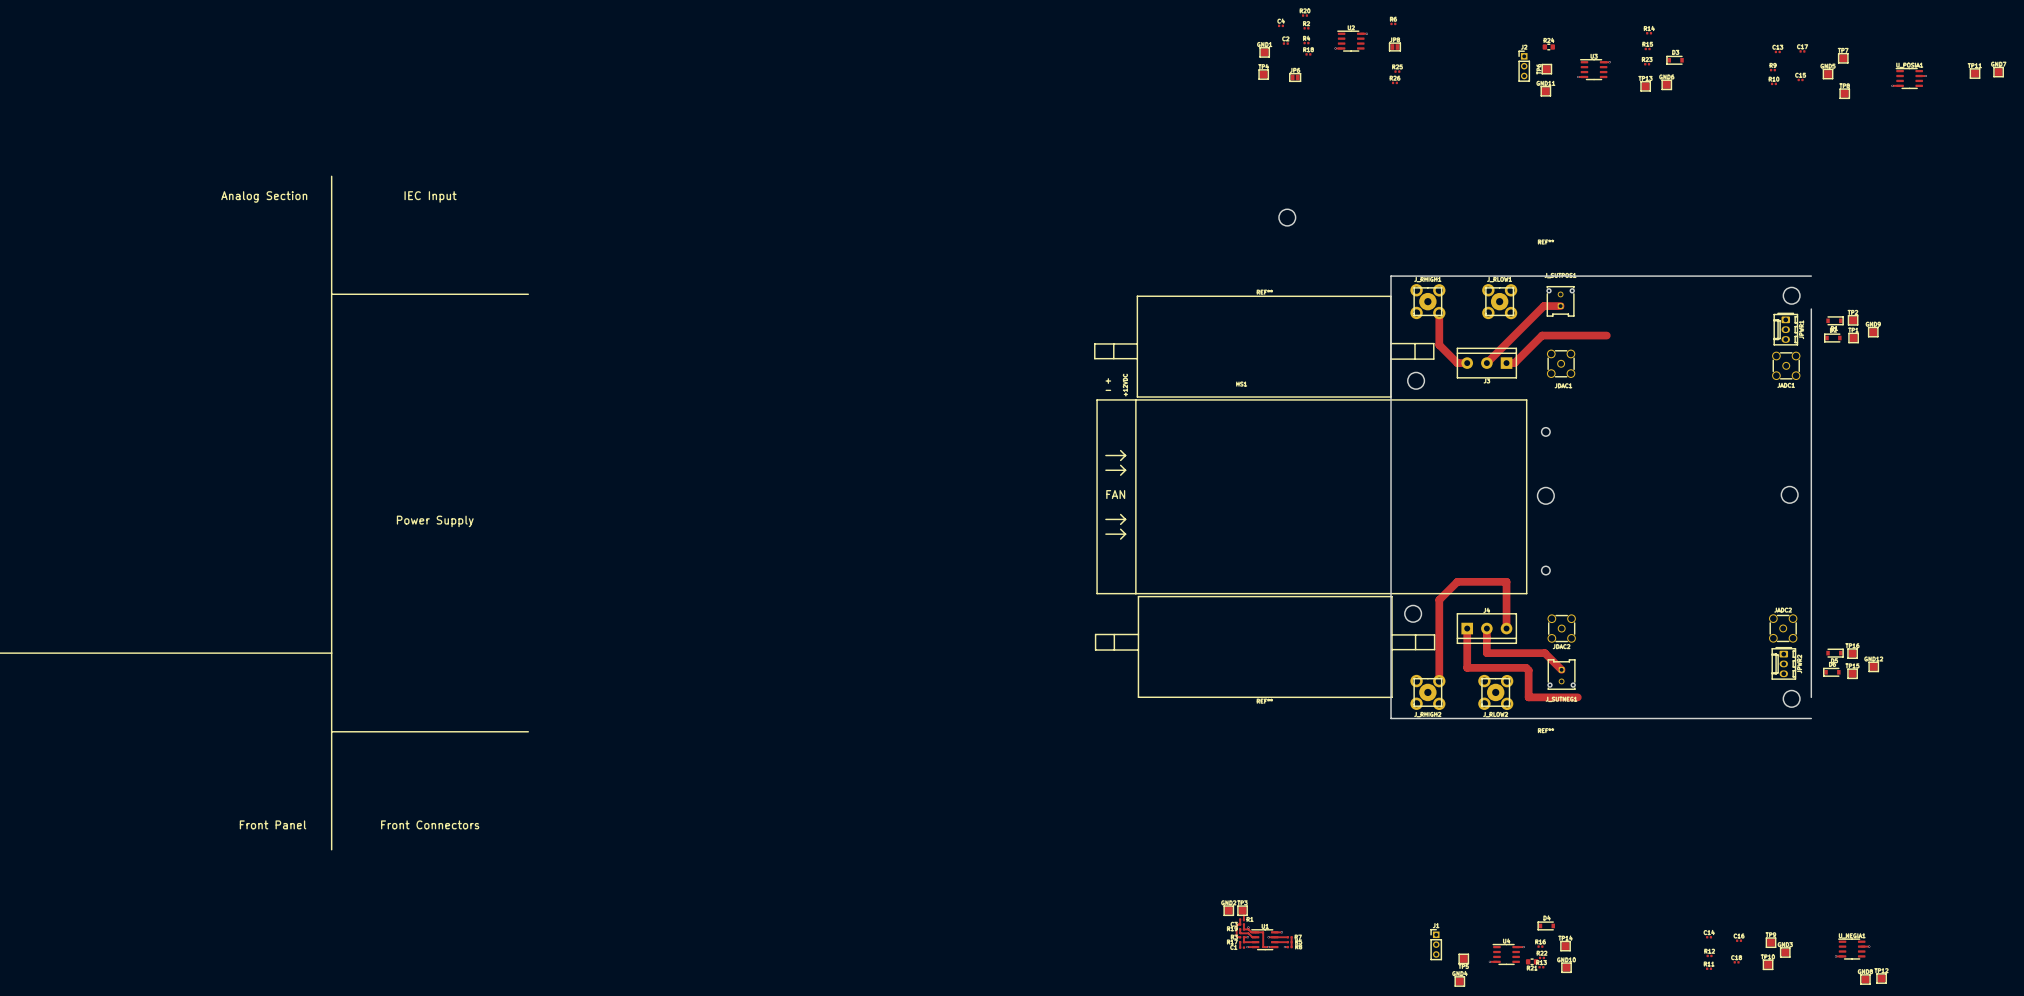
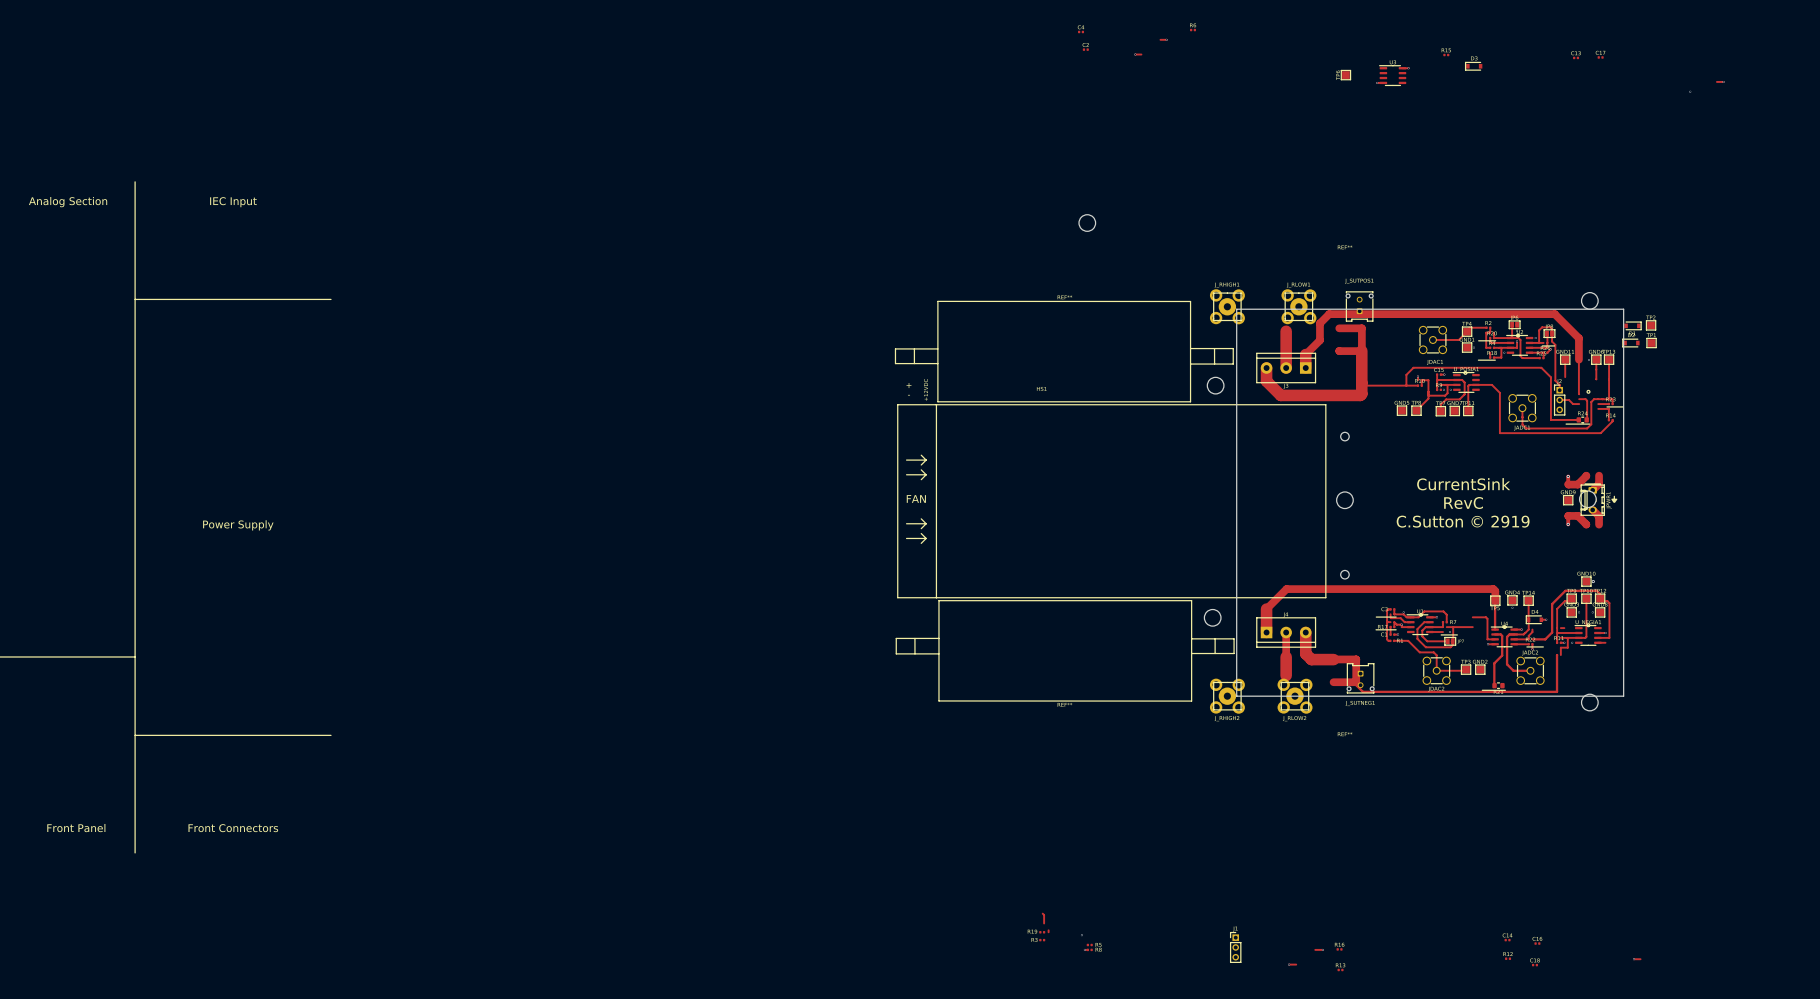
part position: (1304, 15) -> (1492, 338)
part position: (1306, 28) -> (1488, 327)
part position: (1649, 33) -> (1610, 420)
part position: (1351, 41) -> (1519, 345)
part position: (1306, 43) -> (1492, 347)
part position: (1394, 47) -> (1549, 333)
part position: (1548, 47) -> (1582, 419)
part position: (1264, 52) -> (1467, 347)
part position: (1308, 54) -> (1492, 357)
part position: (1843, 58) -> (1440, 411)
part position: (1647, 64) -> (1610, 404)
part position: (1524, 66) -> (1559, 400)
part position: (1772, 70) -> (1438, 389)
part position: (1397, 71) -> (1541, 358)
part position: (1998, 72) -> (1454, 410)
part position: (1975, 73) -> (1468, 410)
part position: (1263, 74) -> (1467, 331)
part position: (1828, 74) -> (1402, 410)
part position: (1295, 77) -> (1514, 324)
part position: (1909, 78) -> (1466, 382)
part position: (1800, 79) -> (1438, 374)
part position: (1394, 82) -> (1545, 352)
part position: (1773, 83) -> (1419, 385)
part position: (1666, 84) -> (1596, 359)
track: (1892, 85) (1900, 85) -> none
part position: (1645, 86) -> (1609, 359)
part position: (1545, 91) -> (1565, 359)
part position: (1844, 93) -> (1416, 410)
board edge: (1811, 276) (1391, 276) (1391, 718) (1811, 718) -> none
board edge: none -> (1236, 309) (1623, 309) (1623, 696) (1236, 696) (1236, 309)
track: (1560, 306) (1543, 306) (1486, 363) -> (1286, 331) (1286, 368)
board edge: (1811, 309) (1811, 697) -> none
track: (1439, 313) (1439, 345) (1457, 363) (1467, 363) -> (1361, 350) (1360, 395) (1280, 395) (1266, 381) (1266, 368)
track: none -> (1512, 324) (1510, 338)
track: none -> (1486, 327) (1469, 327) (1458, 339) (1432, 339)
track: none -> (1490, 327) (1490, 332) (1486, 332) (1486, 347) (1490, 347)
track: none -> (1339, 328) (1361, 328) (1361, 350) (1339, 350)
via: none -> (1517, 330)
track: none -> (1493, 332) (1493, 338) (1518, 338) (1520, 339) (1520, 356) (1522, 358) (1539, 358)
track: none -> (1547, 332) (1547, 347) (1529, 347)
drawing: none -> [1516, 333, 1520, 338]
track: none -> (1551, 333) (1550, 327) (1542, 327) (1539, 330) (1539, 342)
track: none -> (1552, 333) (1552, 341) (1555, 344) (1555, 380) (1559, 385) (1559, 390)
part position: (1785, 329) -> (1592, 499)
part position: (1873, 332) -> (1568, 500)
track: none -> (1490, 338) (1491, 342) (1510, 342)
via: none -> (1535, 338)
track: (1606, 335) (1542, 335) (1514, 363) (1506, 363) -> (1579, 394) (1578, 338) (1554, 314) (1329, 314) (1319, 323) (1319, 340) (1305, 354) (1305, 368)
line: none -> (1478, 340) (1495, 340)
track: none -> (1517, 341) (1517, 347) (1493, 347)
via: none -> (1517, 341)
track: none -> (1529, 342) (1543, 342)
line: none -> (1542, 345) (1554, 345)
via: none -> (1473, 347)
track: none -> (1501, 347) (1501, 357) (1493, 357)
track: none -> (1550, 349) (1547, 352)
via: none -> (1550, 349)
track: none -> (1490, 352) (1490, 357)
via: none -> (1504, 352)
track: none -> (1529, 352) (1543, 352) (1543, 358)
track: none -> (1565, 359) (1565, 377)
track: none -> (1596, 359) (1596, 379)
line: none -> (1478, 360) (1495, 360)
via: none -> (1589, 359)
part position: (1561, 363) -> (1432, 339)
part position: (1786, 365) -> (1522, 408)
drawing: none -> [1463, 371, 1468, 375]
track: none -> (1437, 374) (1437, 390)
track: none -> (1440, 374) (1444, 374)
via: none -> (1444, 374)
track: none -> (1417, 376) (1418, 380)
via: none -> (1417, 376)
track: none -> (1437, 380) (1462, 380) (1464, 382) (1464, 394) (1459, 399) (1446, 399) (1440, 404) (1440, 411)
track: none -> (1361, 382) (1364, 385) (1418, 385)
track: none -> (1406, 385) (1406, 374) (1413, 367) (1541, 367) (1550, 377) (1550, 419) (1578, 419)
track: none -> (1421, 385) (1421, 380) (1428, 380) (1428, 398) (1416, 410)
track: none -> (1440, 384) (1456, 384)
track: none -> (1447, 384) (1447, 393) (1445, 395) (1428, 395)
via: none -> (1443, 389)
via: none -> (1450, 389)
drawing: none -> [1586, 390, 1591, 394]
track: none -> (1579, 399) (1587, 400) (1586, 419)
track: none -> (1612, 399) (1594, 399) (1591, 401) (1591, 424) (1587, 428) (1526, 428) (1522, 424) (1522, 417)
track: none -> (1612, 399) (1612, 404)
track: none -> (1559, 400) (1569, 400) (1573, 404) (1579, 404)
track: none -> (1598, 404) (1608, 404)
line: none -> (1606, 406) (1623, 406)
track: none -> (1522, 408) (1522, 417)
track: none -> (1598, 408) (1608, 408) (1608, 420)
track: none -> (1468, 410) (1468, 386) (1491, 384) (1499, 392) (1499, 433) (1600, 433) (1612, 420)
line: none -> (1566, 424) (1589, 424)
track: none -> (1586, 475) (1577, 484) (1568, 484) (1568, 476)
track: none -> (1599, 475) (1599, 483) (1592, 490)
via: none -> (1568, 476)
text: none -> CurrentSink (1463, 484)
line: none -> (1614, 496) (1614, 499)
line: none -> (1611, 499) (1616, 499)
line: none -> (1612, 500) (1616, 500)
line: none -> (1613, 501) (1615, 501)
line: none -> (1613, 502) (1614, 502)
text: none -> RevC (1463, 503)
track: none -> (1592, 509) (1599, 516) (1599, 524)
text: none -> C.Sutton © 2919 (1463, 521)
track: none -> (1568, 524) (1568, 515) (1577, 515) (1586, 524)
via: none -> (1568, 524)
via: none -> (1593, 581)
track: none -> (1495, 600) (1495, 629)
track: none -> (1528, 600) (1528, 629) (1523, 634) (1509, 634) (1507, 636) (1507, 664) (1513, 670) (1530, 670)
track: none -> (1571, 601) (1564, 601) (1557, 608) (1557, 642)
track: none -> (1586, 601) (1586, 636) (1560, 637)
via: none -> (1512, 607)
track: none -> (1390, 609) (1387, 610) (1387, 639) (1390, 640)
track: none -> (1394, 609) (1394, 614) (1403, 614) (1406, 617) (1418, 617) (1424, 611) (1443, 611) (1446, 614) (1446, 622)
via: none -> (1403, 612)
via: none -> (1579, 612)
via: none -> (1592, 612)
drawing: none -> [1419, 613, 1423, 617]
track: none -> (1390, 614) (1390, 618) (1400, 618) (1404, 622) (1410, 622)
line: none -> (1376, 617) (1396, 617)
track: none -> (1429, 617) (1437, 617)
via: none -> (1437, 617)
track: none -> (1472, 617) (1486, 617) (1487, 639) (1495, 639)
track: none -> (1541, 619) (1546, 619)
via: none -> (1546, 619)
track: none -> (1390, 622) (1387, 622)
track: none -> (1429, 622) (1424, 622) (1417, 629) (1417, 638) (1425, 647) (1450, 647) (1452, 645) (1451, 641)
track: none -> (1442, 622) (1442, 627) (1425, 627) (1422, 630) (1422, 636) (1427, 641) (1446, 641)
drawing: none -> [1586, 623, 1591, 627]
via: none -> (1401, 624)
drawing: none -> [1502, 625, 1507, 629]
track: none -> (1390, 627) (1390, 634)
track: none -> (1394, 627) (1394, 622) (1396, 624) (1401, 624) (1401, 627) (1410, 627)
track: none -> (1446, 627) (1472, 627)
track: none -> (1453, 627) (1453, 641)
track: none -> (1560, 628) (1564, 628)
line: none -> (1376, 629) (1396, 629)
track: none -> (1514, 629) (1521, 629)
via: none -> (1521, 629)
track: none -> (1532, 629) (1528, 639) (1514, 639)
track: (1467, 628) (1467, 667) (1526, 667) (1528, 670) (1528, 697) (1577, 697) -> (1266, 632) (1266, 609) (1286, 589) (1493, 589) (1495, 591) (1495, 600)
track: (1506, 628) (1506, 581) (1457, 581) (1439, 599) (1439, 681) -> (1305, 632) (1305, 653) (1311, 659) (1356, 659) (1356, 682)
part position: (1561, 628) -> (1436, 670)
track: none -> (1429, 632) (1442, 632)
via: none -> (1450, 632)
part position: (1783, 628) -> (1530, 670)
track: none -> (1578, 632) (1557, 633)
track: none -> (1597, 632) (1605, 632)
via: none -> (1605, 632)
track: none -> (1394, 634) (1397, 634)
via: none -> (1398, 634)
track: none -> (1495, 634) (1502, 635) (1502, 655) (1494, 663) (1494, 685)
line: none -> (1441, 634) (1457, 634)
track: none -> (1567, 637) (1567, 647) (1560, 647) (1560, 655)
track: none -> (1597, 637) (1609, 637) (1609, 603) (1607, 601) (1600, 601) (1600, 594) (1596, 590) (1565, 590) (1552, 604) (1552, 632) (1545, 639) (1532, 639)
track: none -> (1394, 640) (1408, 640) (1419, 652) (1433, 652) (1436, 655) (1436, 670)
part: none -> (1450, 641)
track: none -> (1560, 642) (1564, 642)
via: none -> (1564, 642)
via: none -> (1572, 642)
track: none -> (1597, 642) (1605, 642)
track: none -> (1487, 644) (1495, 644)
via: none -> (1487, 644)
track: none -> (1514, 644) (1528, 644)
track: none -> (1532, 644) (1532, 649)
line: none -> (1526, 646) (1543, 646)
via: none -> (1532, 649)
track: none -> (1557, 655) (1557, 691) (1362, 691) (1356, 685) (1356, 682)
track: (1486, 653) (1544, 653) (1561, 669) -> (1286, 656) (1286, 675)
part: (1834, 653) -> none
part: (1852, 653) -> none
part: (1783, 663) -> none
track: none -> (1466, 669) (1436, 670)
part: (1873, 666) -> none
part: (1832, 672) -> none
part: (1852, 673) -> none
track: none -> (1333, 682) (1356, 682)
line: none -> (1482, 690) (1505, 690)
part position: (1228, 910) -> (1480, 669)
part position: (1242, 910) -> (1466, 669)
part position: (1242, 919) -> (1392, 640)
track: (1240, 920) (1240, 924) (1236, 925) (1236, 936) (1240, 937) -> none
part position: (1242, 924) -> (1392, 609)
track: (1243, 924) (1243, 929) (1248, 929) (1251, 932) (1263, 932) (1263, 947) (1274, 947) -> none
part position: (1546, 925) -> (1534, 619)
via: (1248, 927) -> none
track: (1240, 929) (1240, 933) (1248, 933) (1252, 937) (1255, 937) -> none
track: (1274, 932) (1281, 932) -> none
track: (1247, 937) (1243, 937) (1243, 942) (1255, 942) -> none
via: (1247, 937) -> none
track: (1268, 937) (1287, 937) -> none
via: (1268, 937) -> none
part position: (1289, 937) -> (1444, 622)
track: (1291, 937) (1291, 947) -> none
part position: (1265, 939) -> (1420, 624)
track: (1240, 942) (1240, 947) -> none
part position: (1242, 942) -> (1392, 627)
track: (1274, 942) (1287, 942) -> none
part position: (1771, 942) -> (1571, 598)
part position: (1565, 946) -> (1528, 600)
track: (1861, 946) (1869, 946) -> none
via: (1869, 946) -> none
part position: (1242, 947) -> (1392, 634)
track: (1247, 947) (1255, 947) -> none
via: (1247, 947) -> none
via: (1268, 947) -> none
part position: (1852, 949) -> (1588, 635)
part position: (1785, 952) -> (1571, 612)
part position: (1506, 954) -> (1504, 636)
part position: (1541, 957) -> (1530, 644)
part position: (1463, 958) -> (1495, 600)
part position: (1532, 961) -> (1498, 685)
part position: (1768, 964) -> (1586, 598)
part position: (1566, 967) -> (1586, 581)
part position: (1709, 968) -> (1558, 642)
part position: (1881, 978) -> (1600, 598)
part position: (1865, 979) -> (1600, 612)
part position: (1459, 981) -> (1512, 600)

